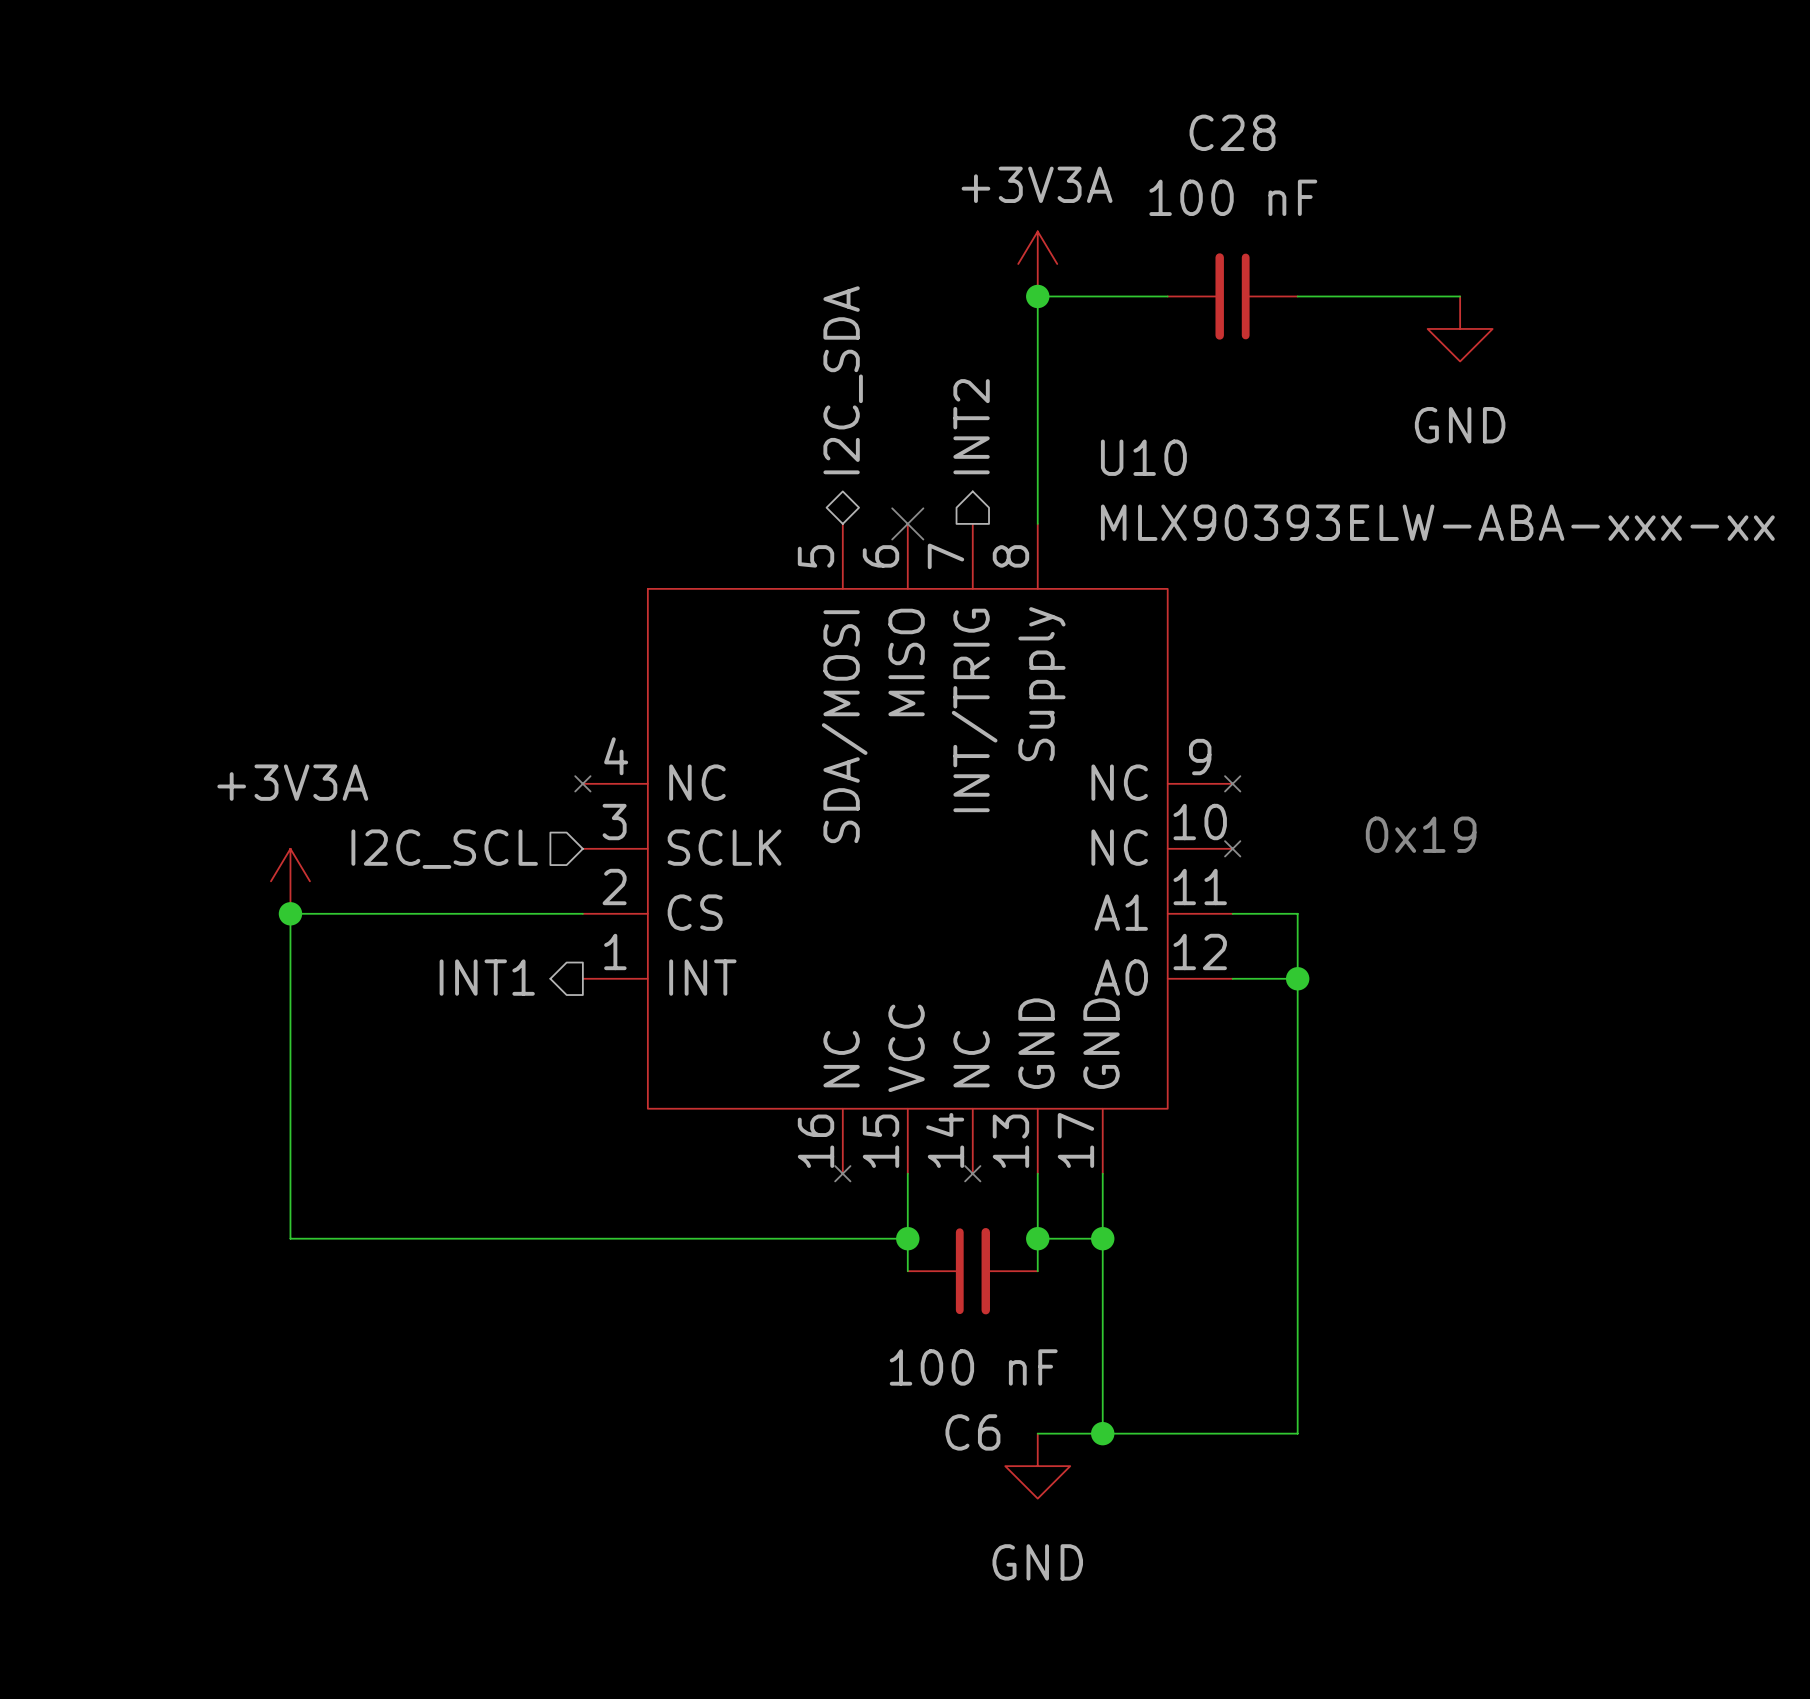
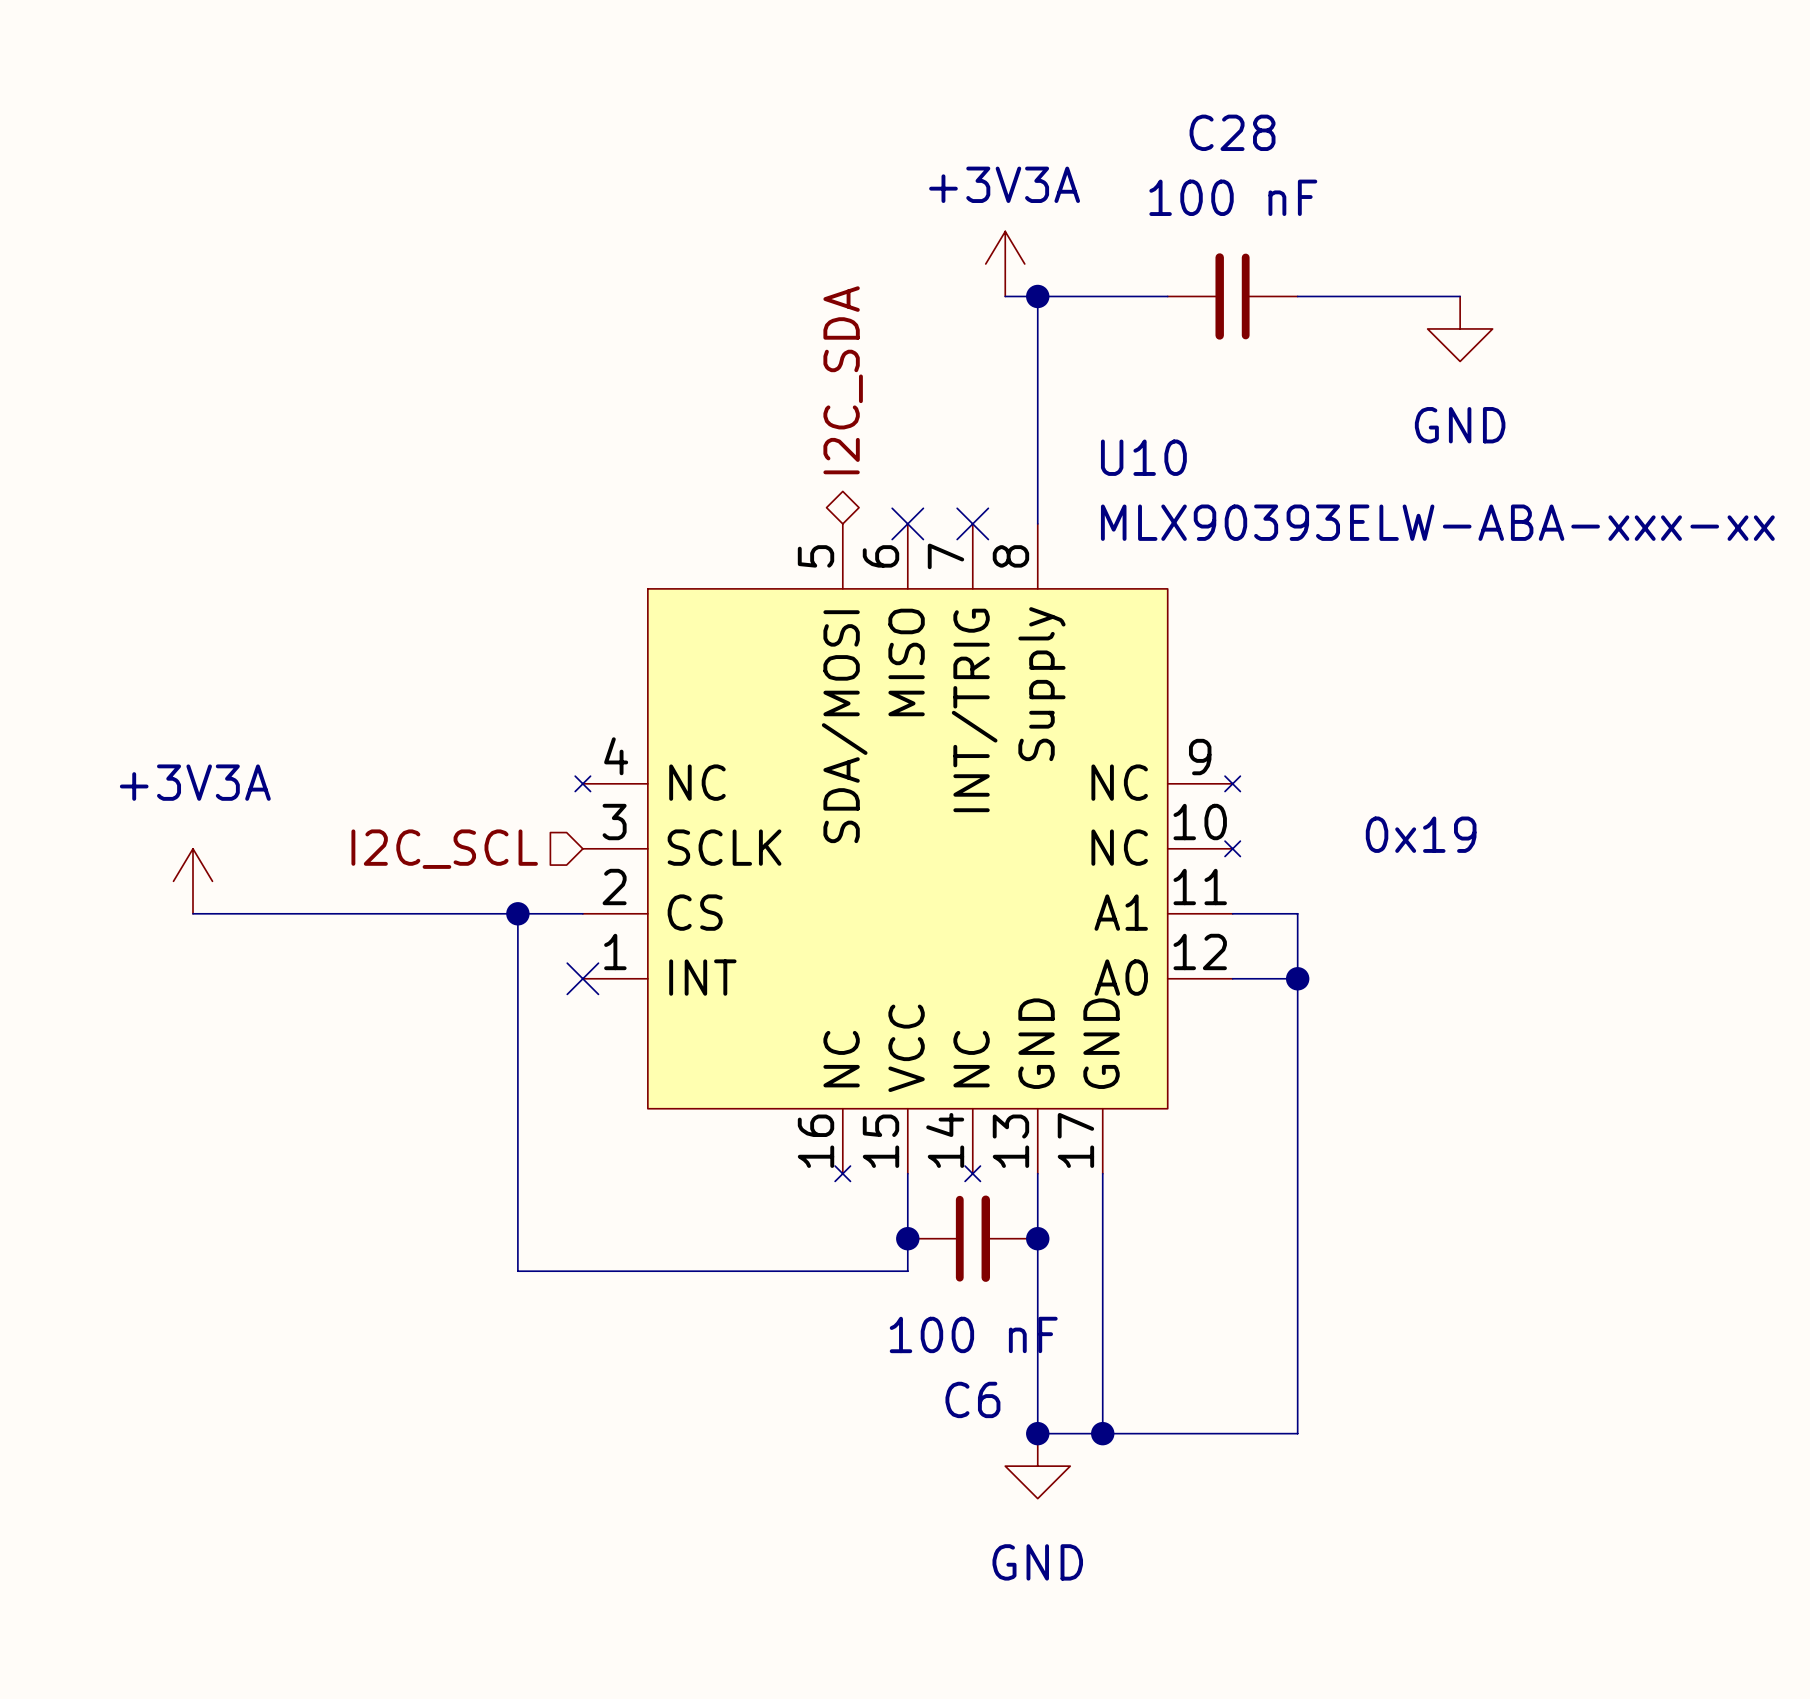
power symbol position: +3V3A (1037, 263) -> +3V3A (1005, 263)
wire: none -> (1005, 296) (1037, 296)
hierarchical label: INT2 (971, 426) -> none
no-connect mark: none -> (972, 523)
power symbol position: +3V3A (290, 881) -> +3V3A (192, 881)
wire: (290, 913) (290, 1238) (907, 1238) -> (290, 913) (192, 913)
junction: (290, 913) -> none
wire: none -> (517, 913) (517, 1271) (907, 1271)
junction: none -> (517, 913)
hierarchical label: INT1 (487, 977) -> none
no-connect mark: none -> (582, 978)
wire: (1037, 1238) (1102, 1238) -> none
junction: (1102, 1238) -> none
C6 position: (972, 1271) -> (972, 1238)
wire: none -> (1037, 1271) (1037, 1433)
junction: none -> (1037, 1433)

